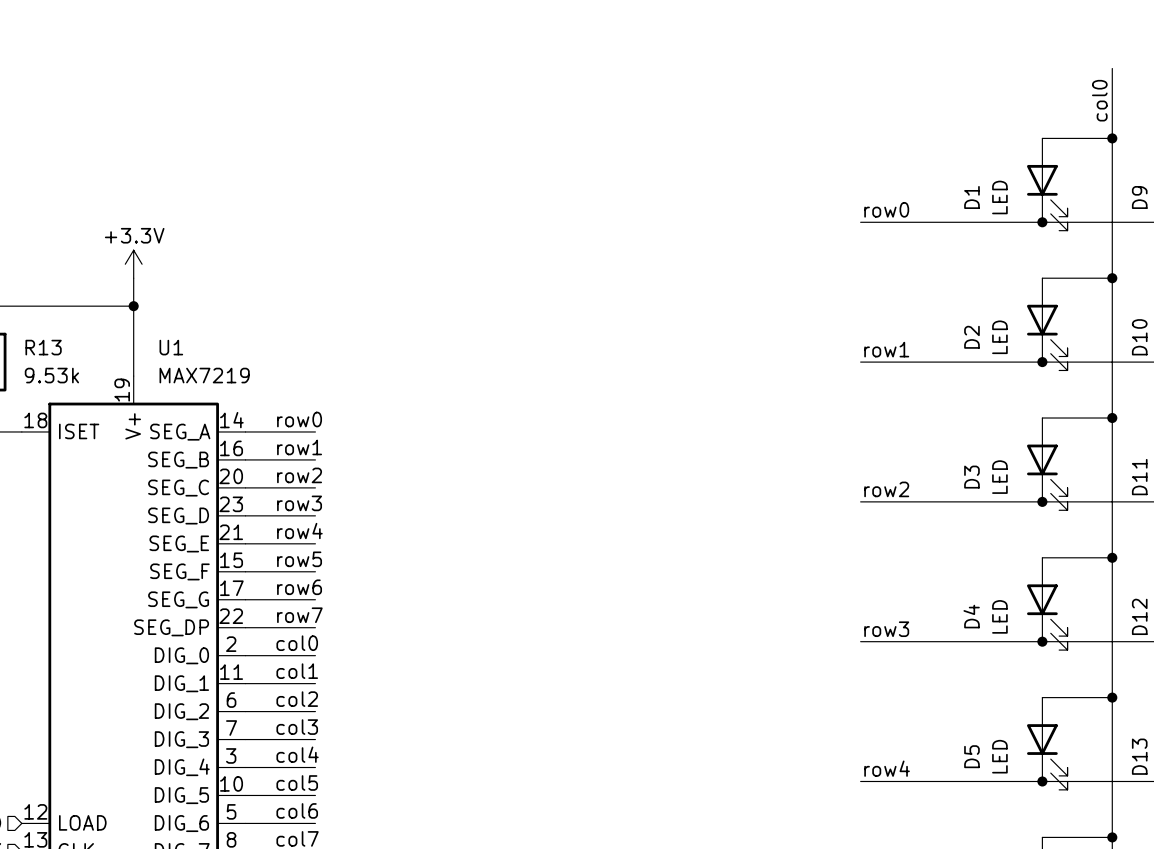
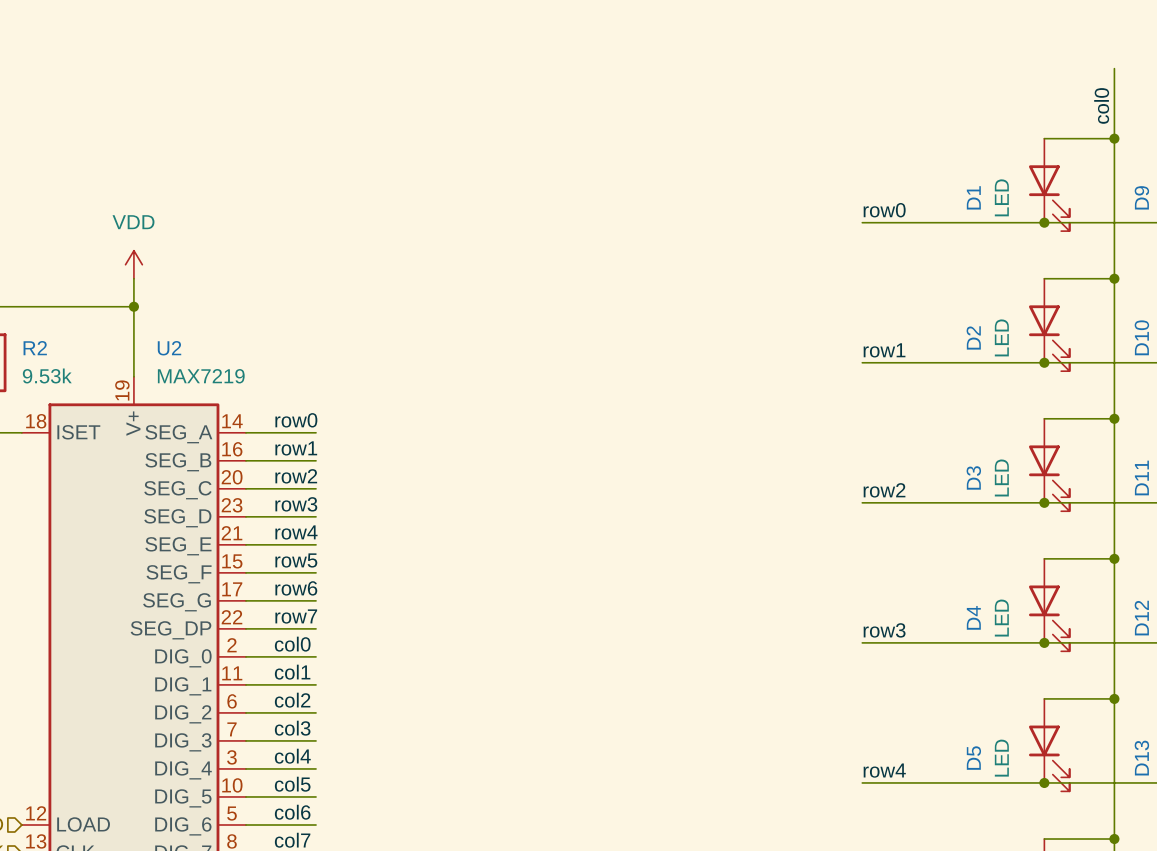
power symbol: +3.3V (133, 264) -> VDD (133, 264)
R13 name: R13 (43, 347) -> R2 (35, 348)
U1 name: U1 (171, 347) -> U2 (169, 348)

